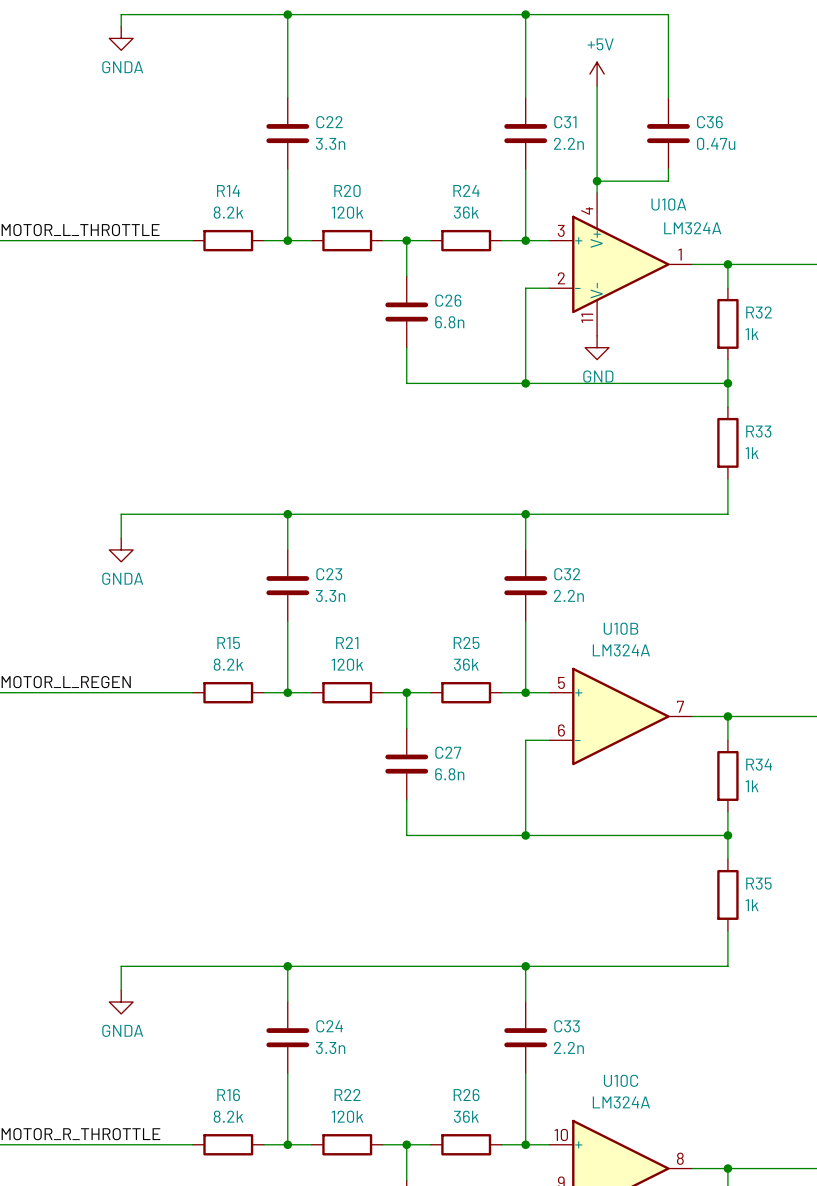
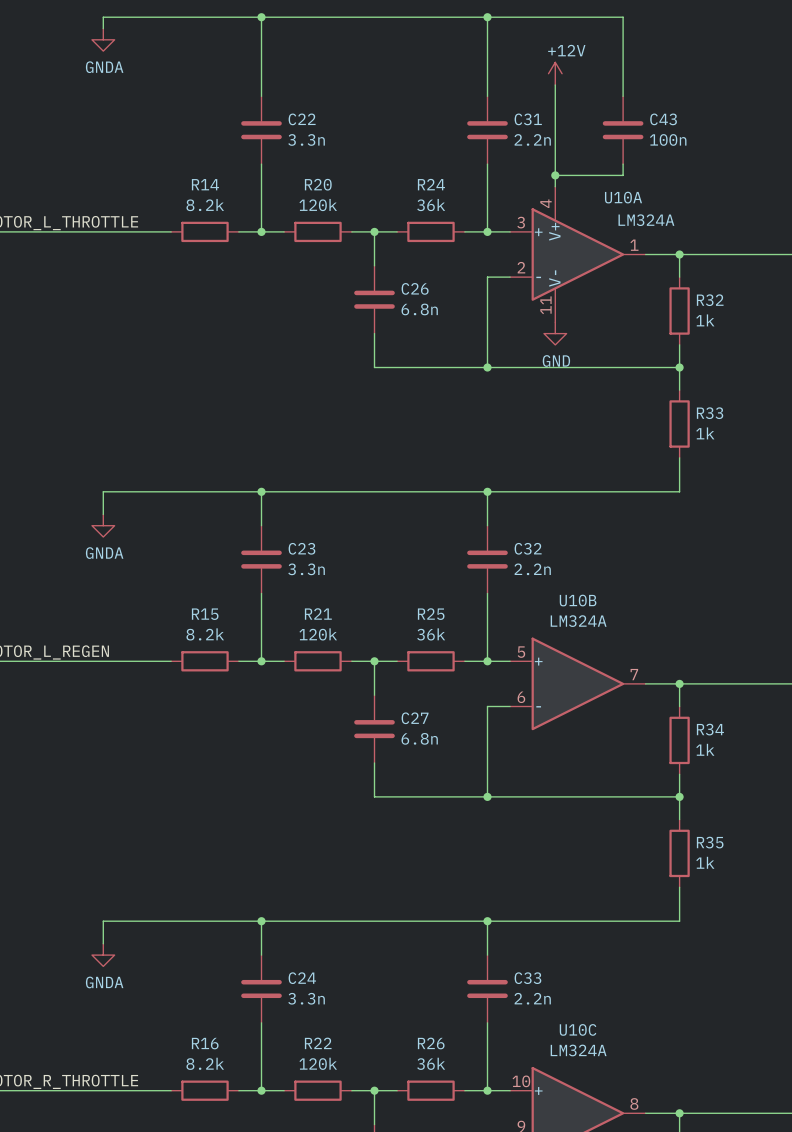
power symbol: +5V (597, 74) -> +12V (555, 73)
C36 name: C36 (709, 122) -> C43 (663, 119)
C36 value: 0.47u (716, 143) -> 100n (668, 139)

